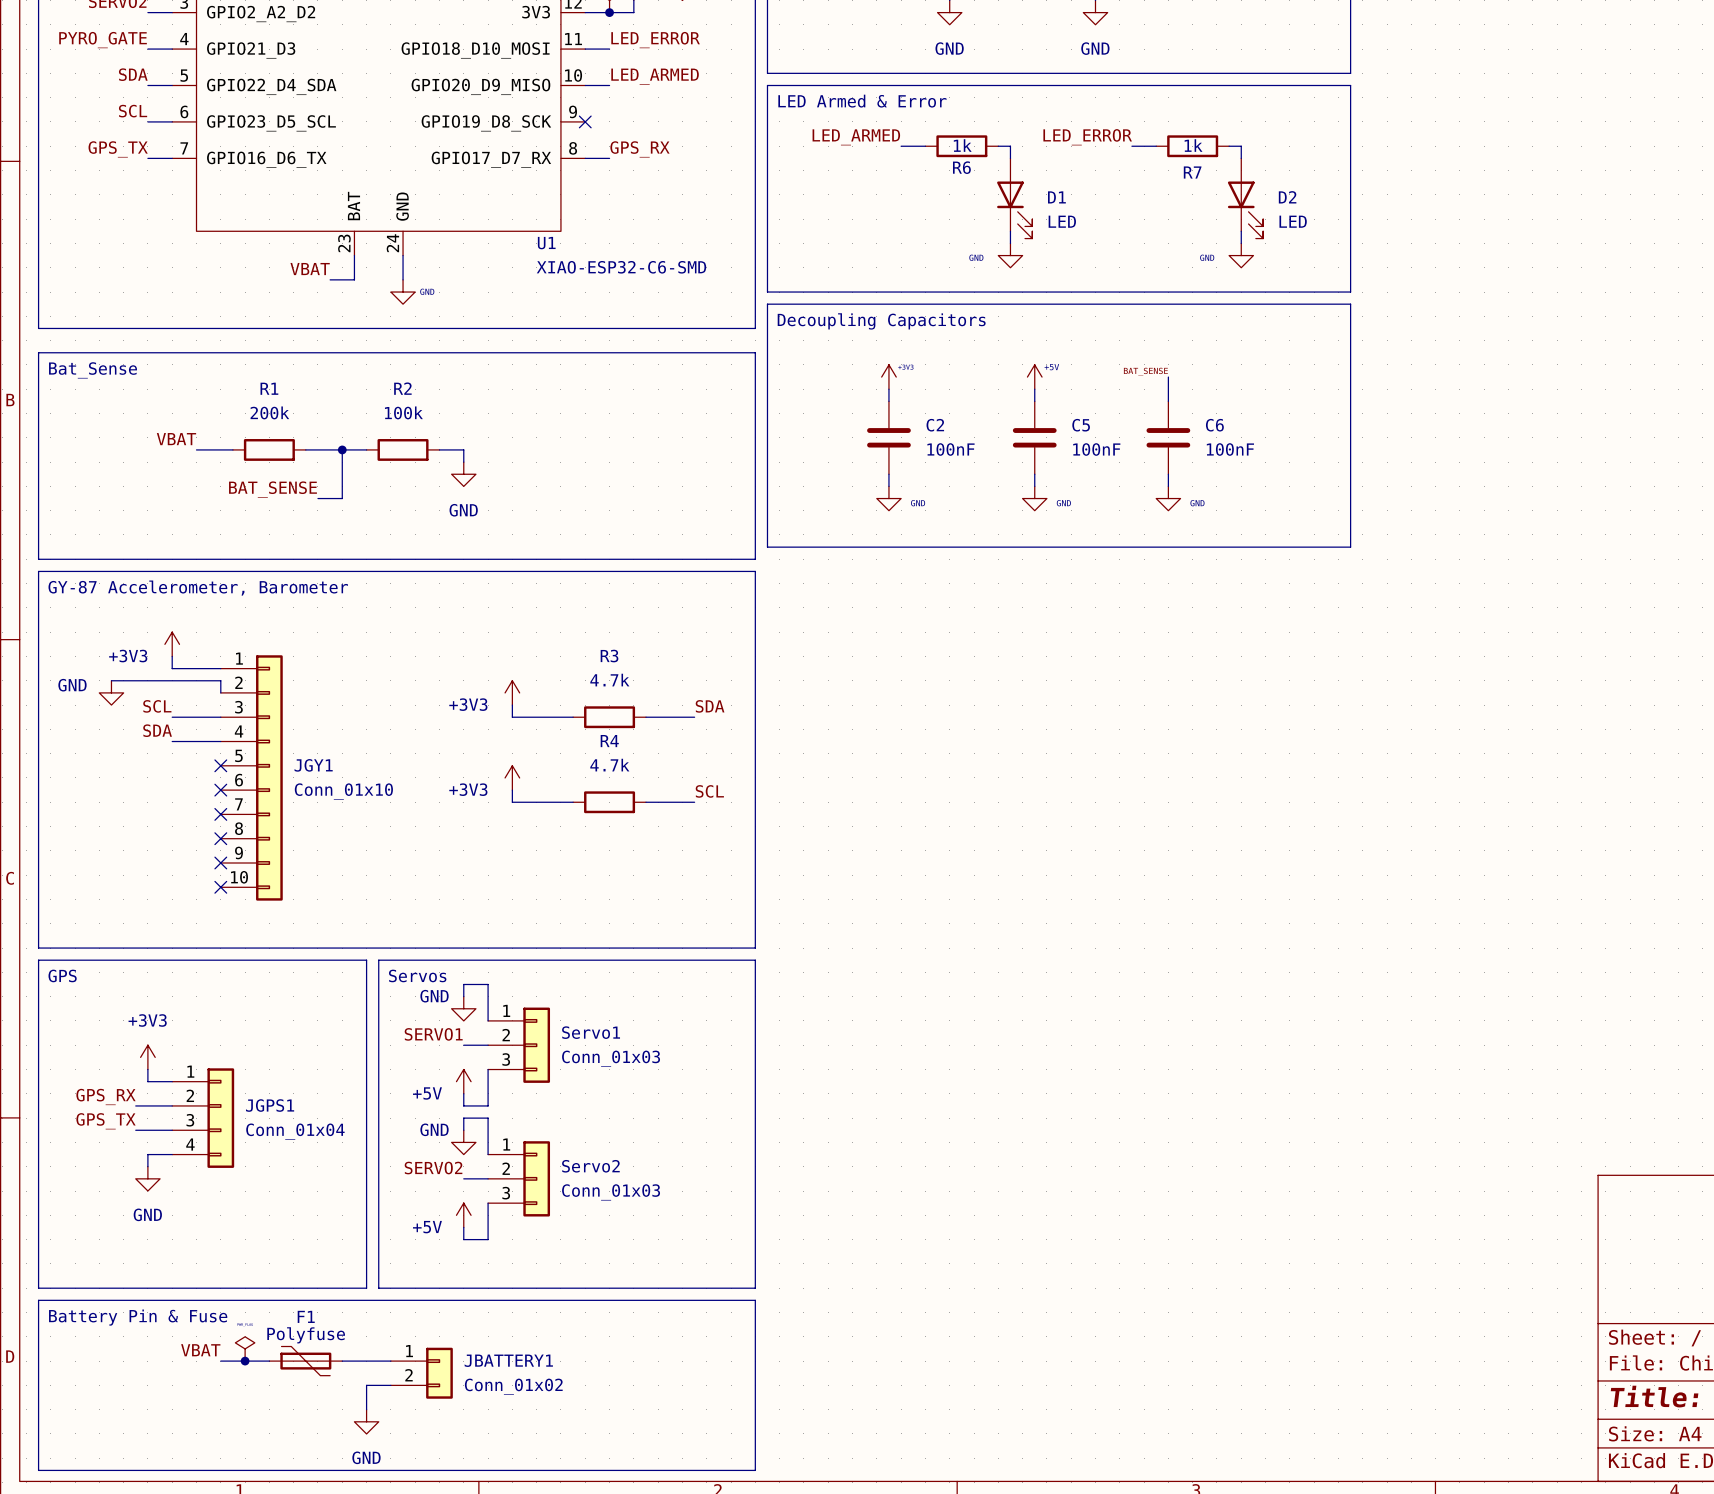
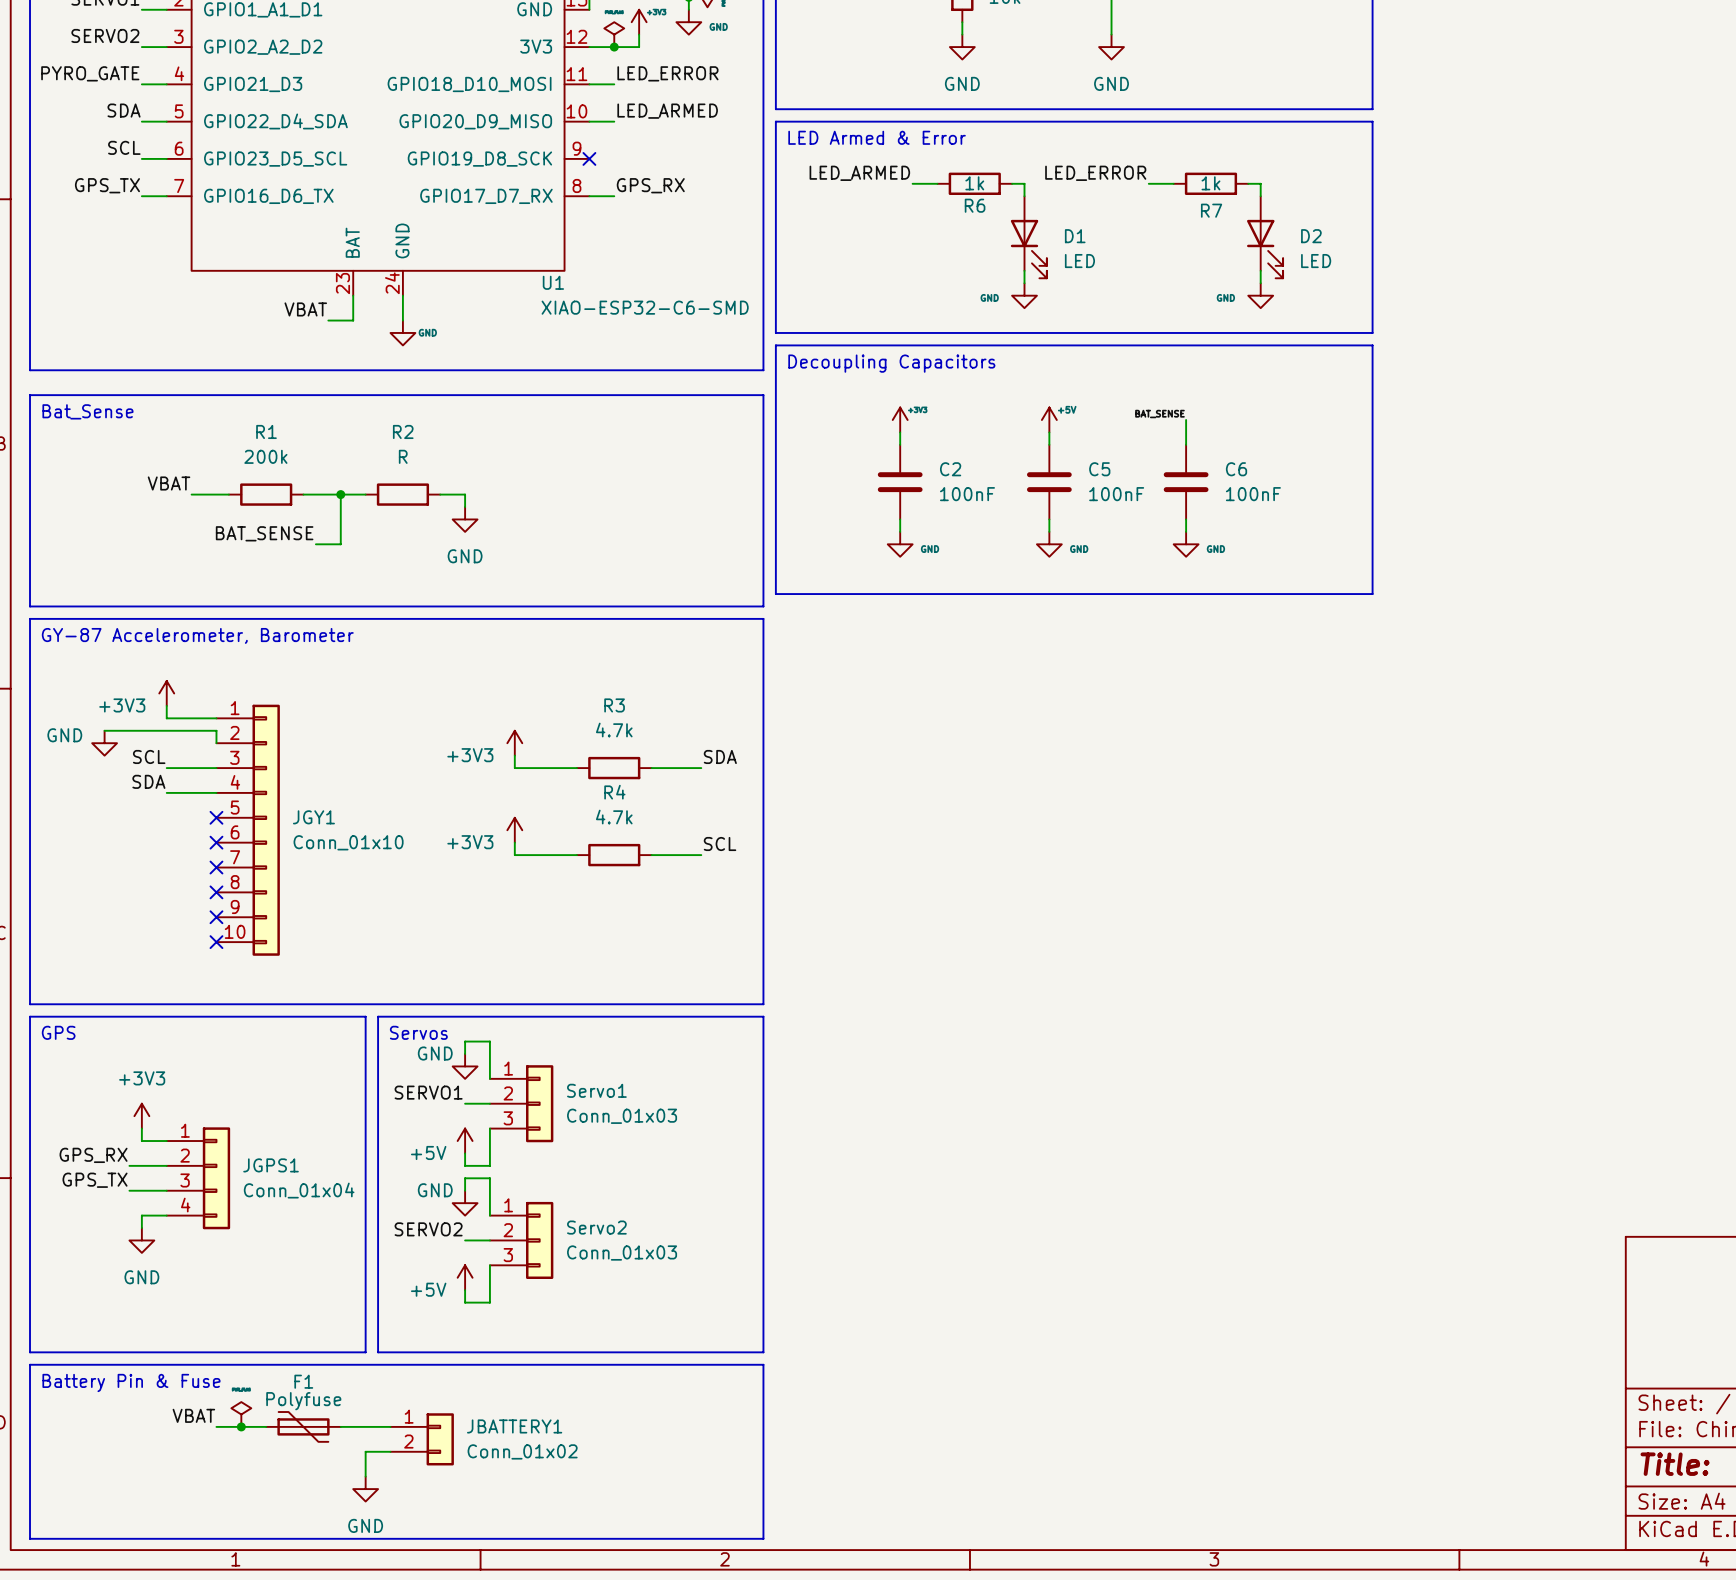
R2 value: 100k (403, 412) -> R (403, 456)

